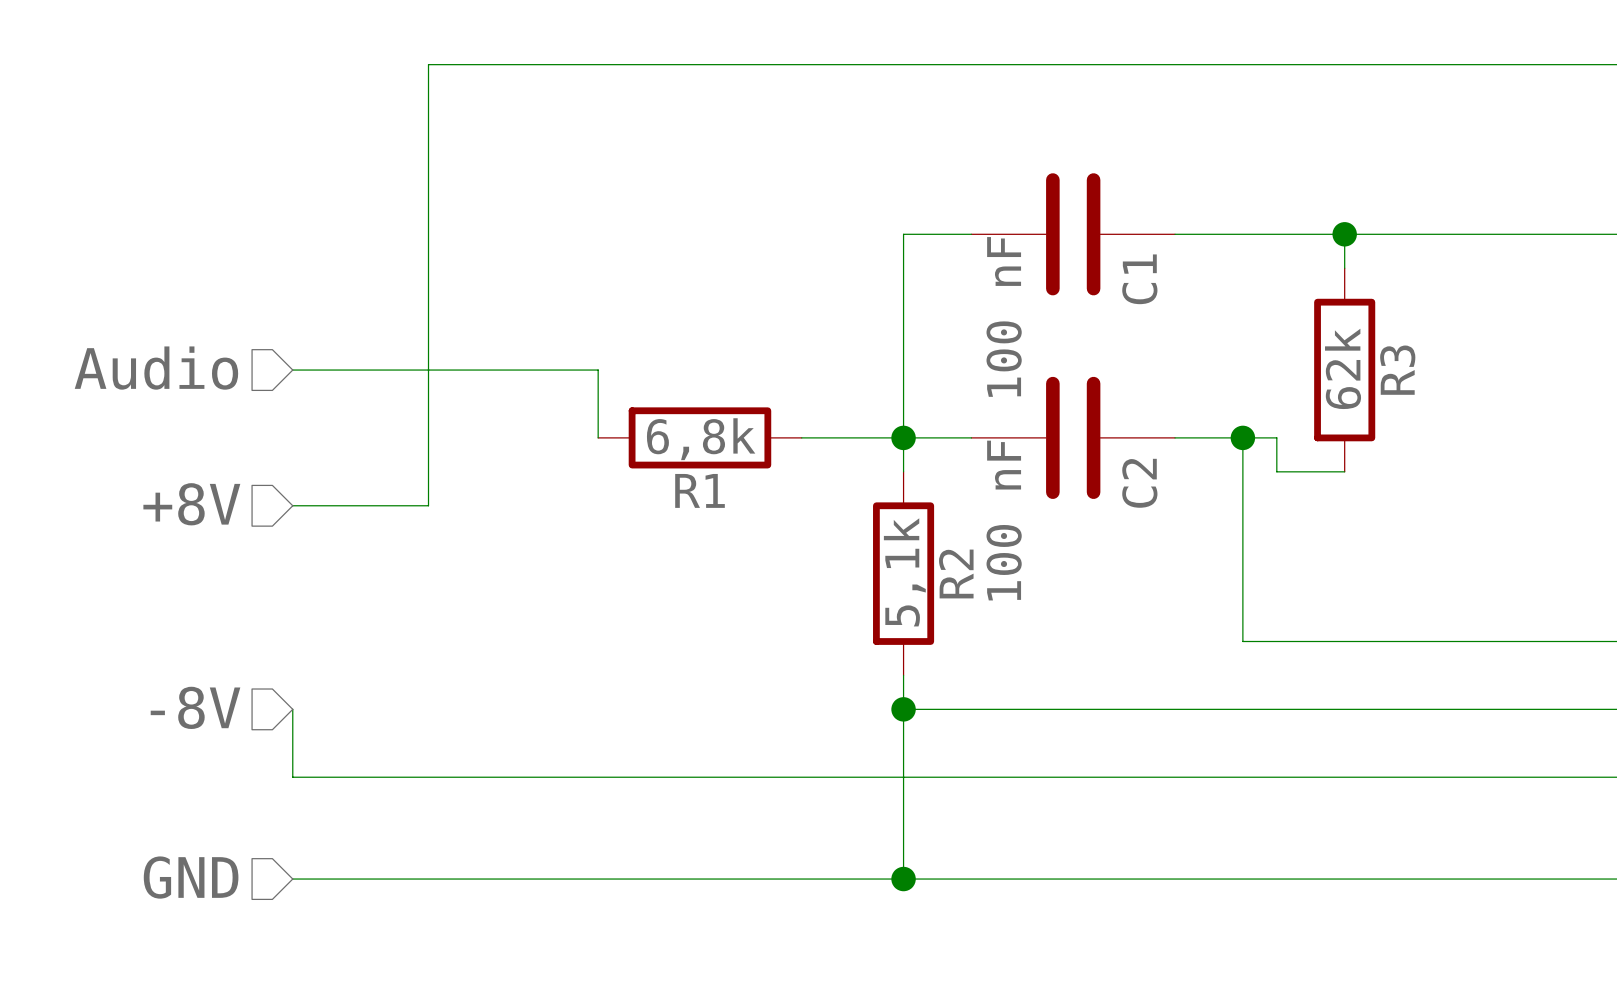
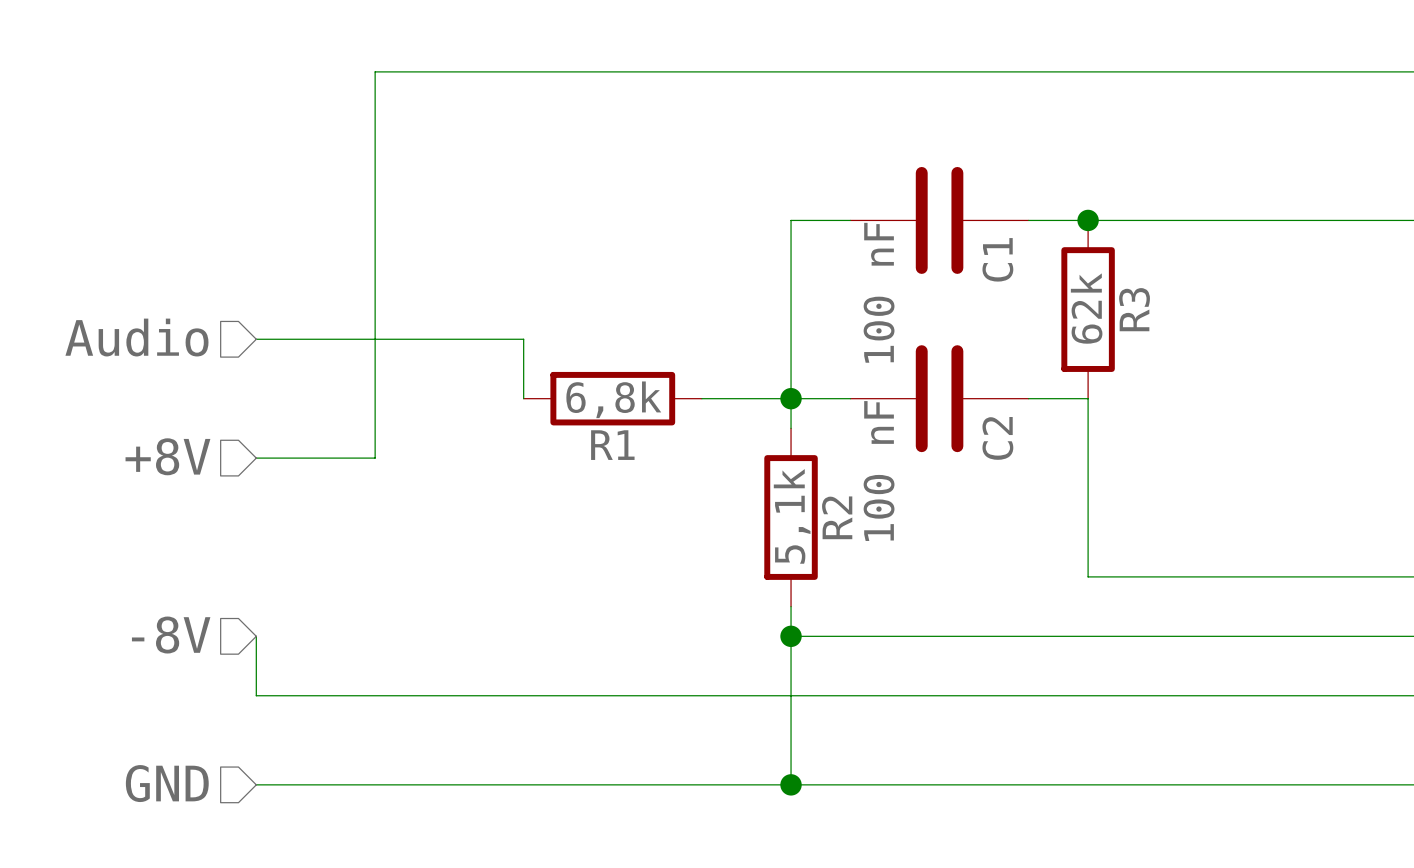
junction: none -> (1088, 220)
wire: (1344, 234) (1344, 268) -> none
junction: (1344, 234) -> none
R3 position: (1344, 370) -> (1088, 309)
wire: (1242, 437) (1276, 437) (1276, 471) (1344, 471) -> none
junction: (1242, 437) -> none

